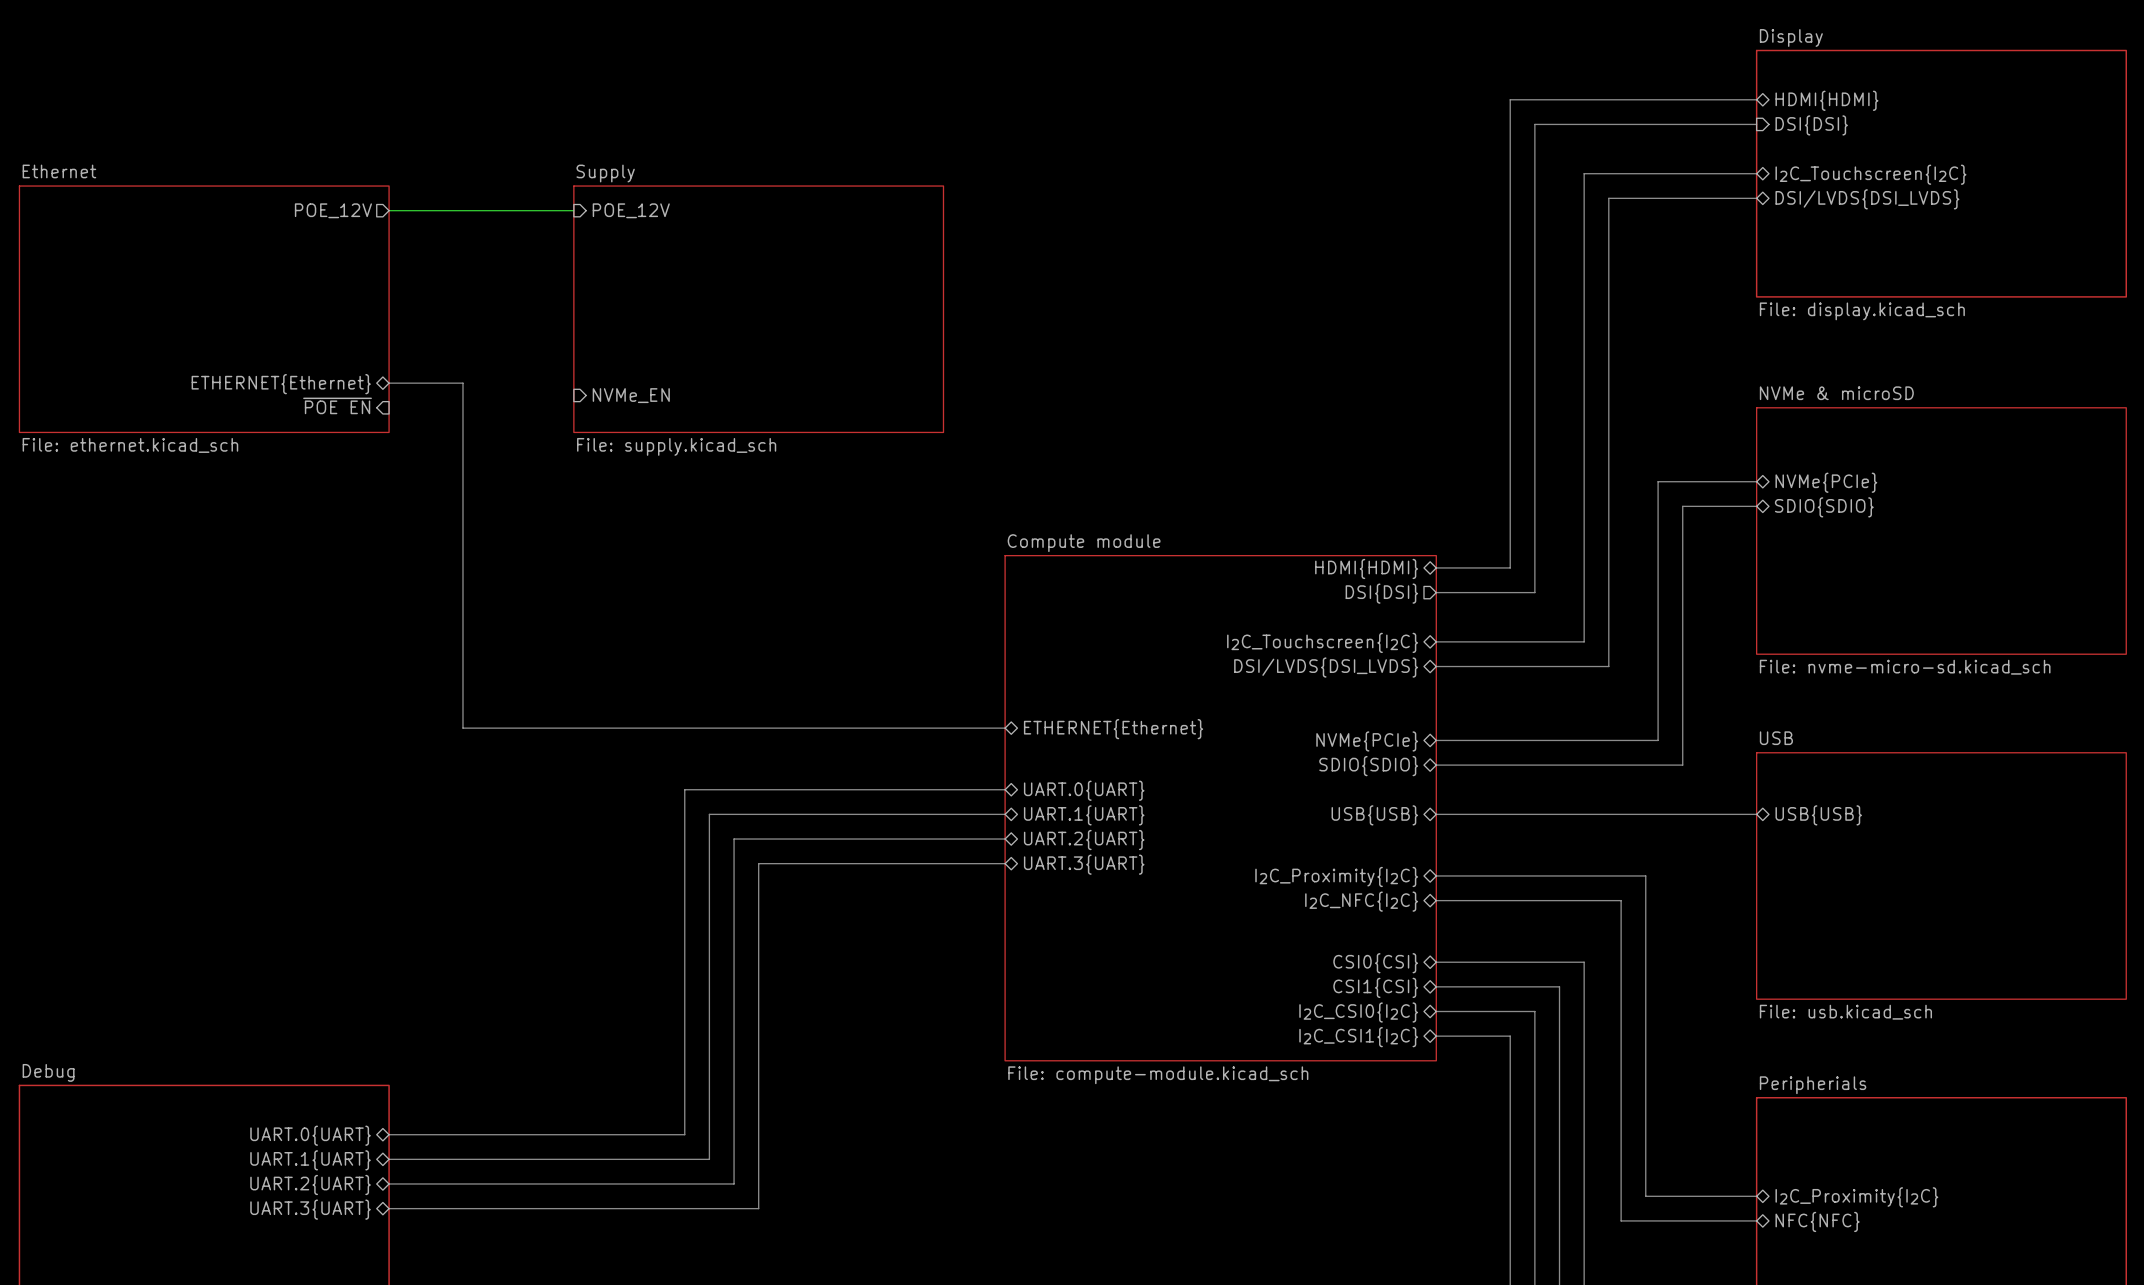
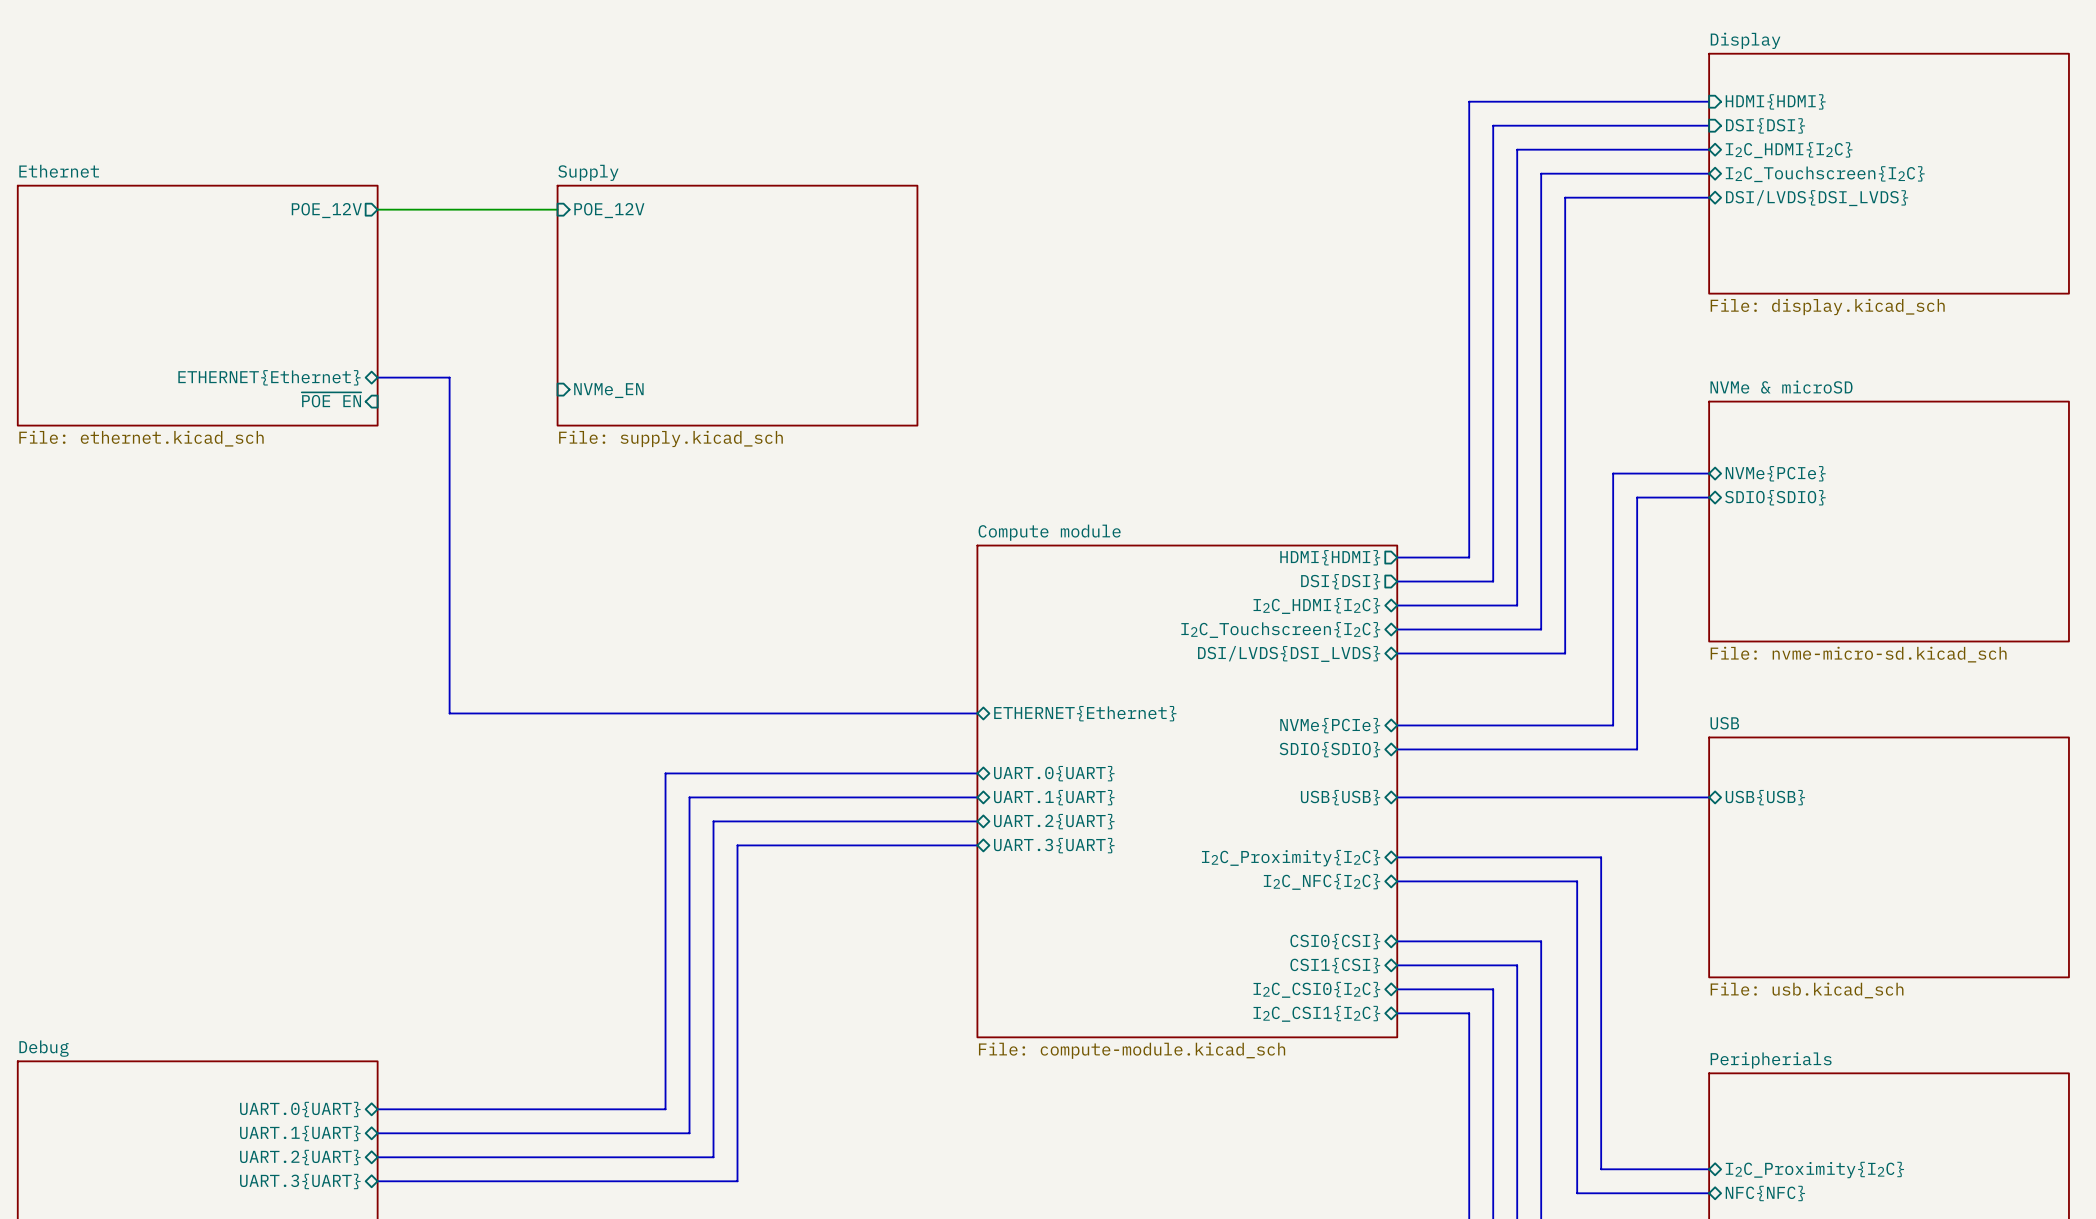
sheet pin shape: bidirectional (1826, 100) -> input (1775, 101)
bus: none -> (1709, 149) (1517, 149) (1517, 605) (1397, 605)
sheet pin: none -> I2C_HDMI{I2C} (1789, 150)
sheet pin shape: bidirectional (1366, 568) -> output (1330, 557)
sheet pin: none -> I2C_HDMI{I2C} (1316, 605)

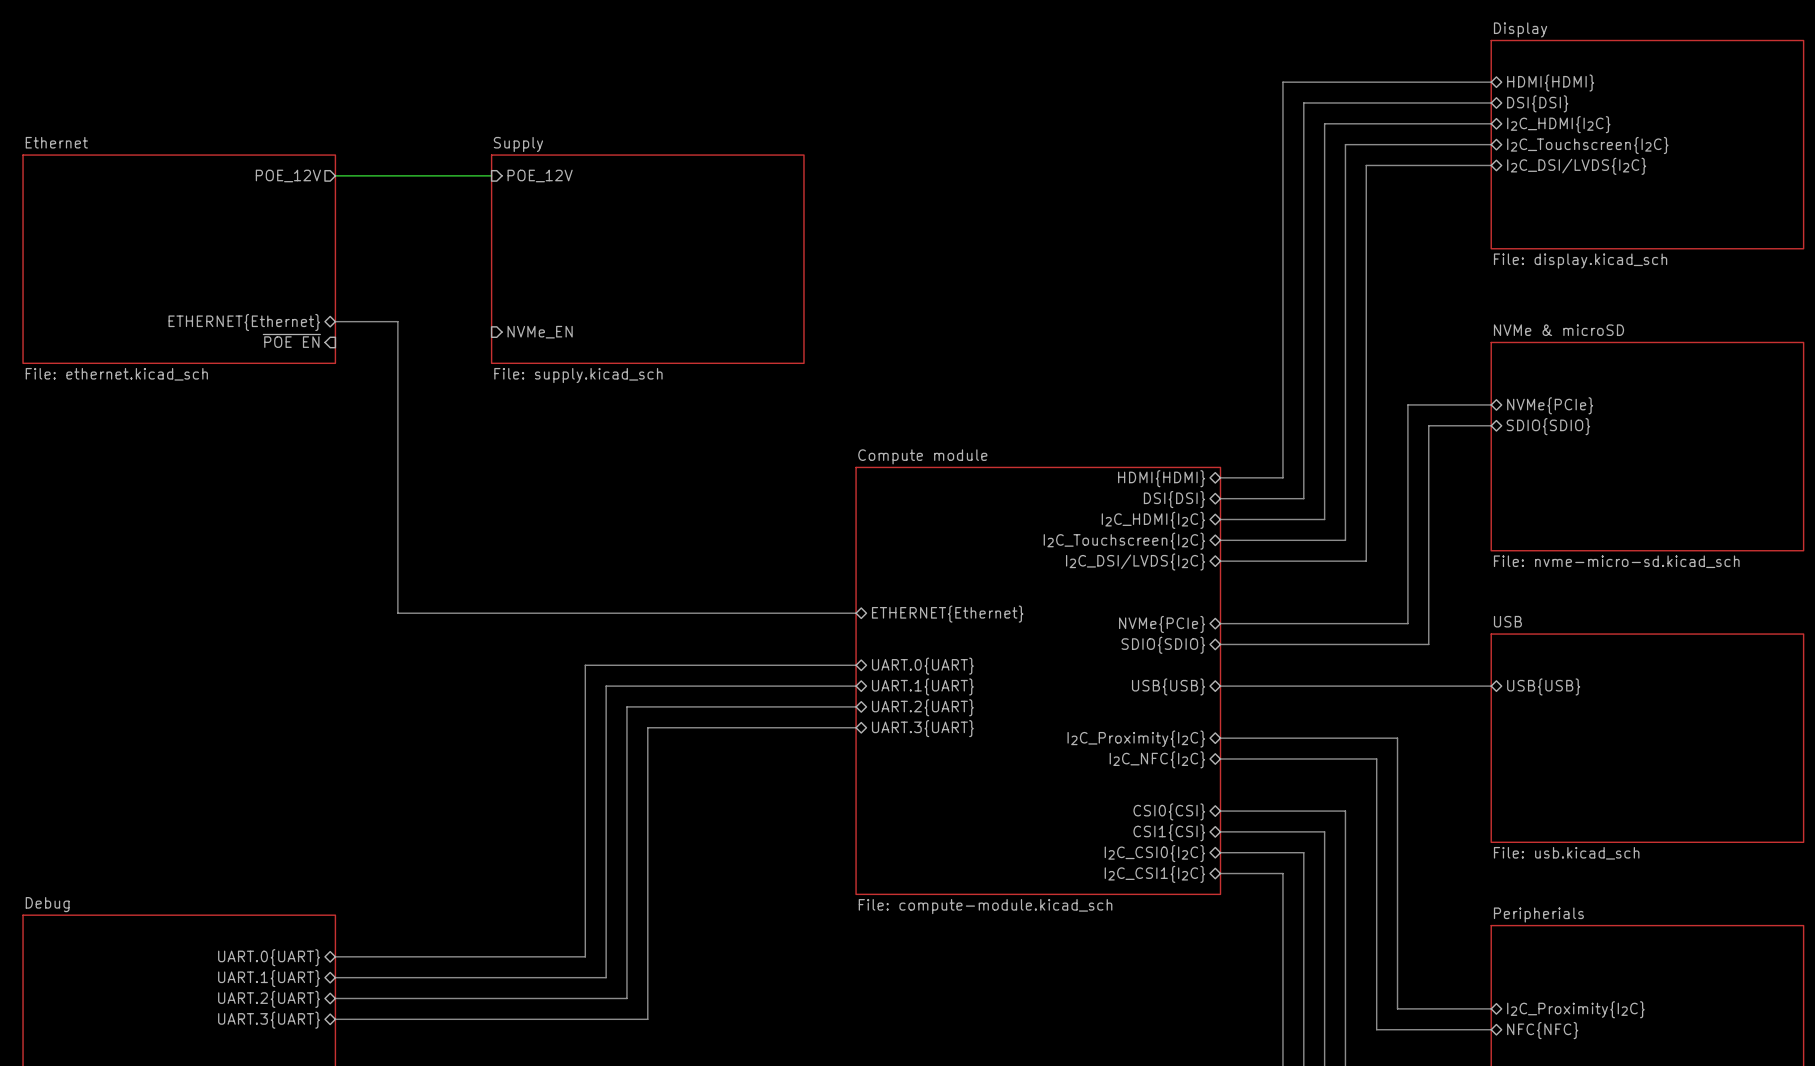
sheet pin shape: input (1775, 101) -> bidirectional (1550, 83)
sheet pin shape: input (1765, 125) -> bidirectional (1537, 103)
sheet pin: DSI/LVDS{DSI_LVDS} (1817, 198) -> I2C_DSI/LVDS{I2C} (1576, 166)
sheet pin shape: output (1330, 557) -> bidirectional (1161, 478)
sheet pin shape: output (1340, 581) -> bidirectional (1174, 499)
sheet pin: DSI/LVDS{DSI_LVDS} (1289, 653) -> I2C_DSI/LVDS{I2C} (1135, 562)

